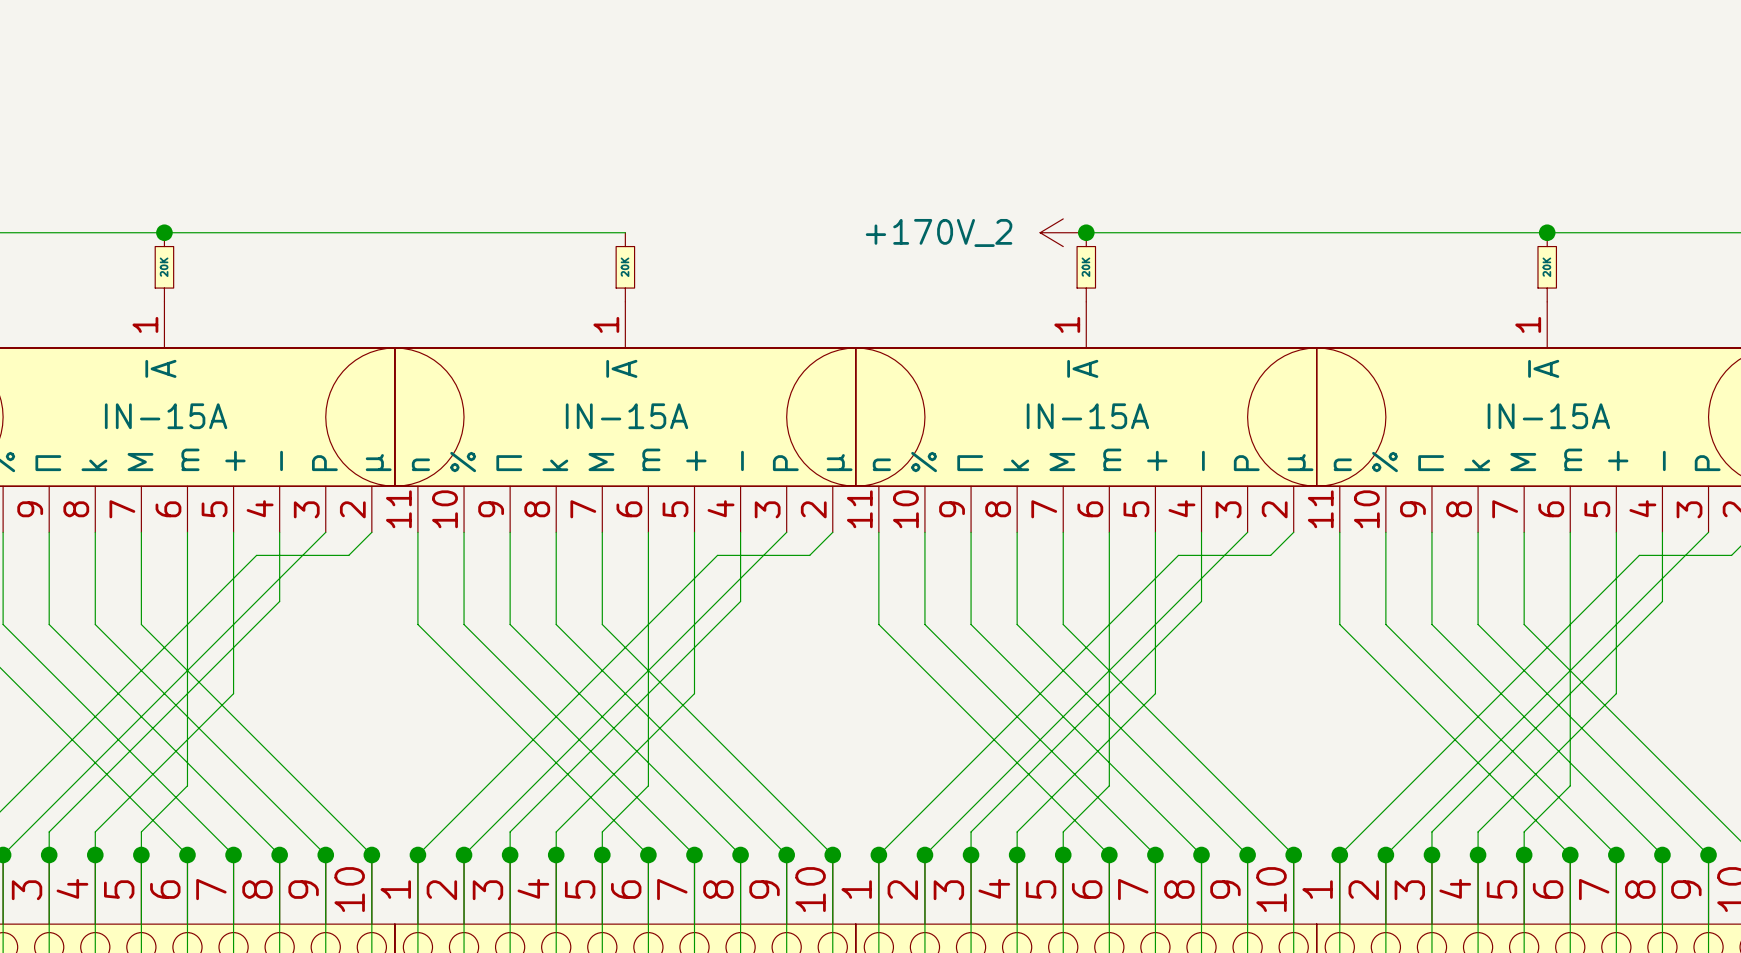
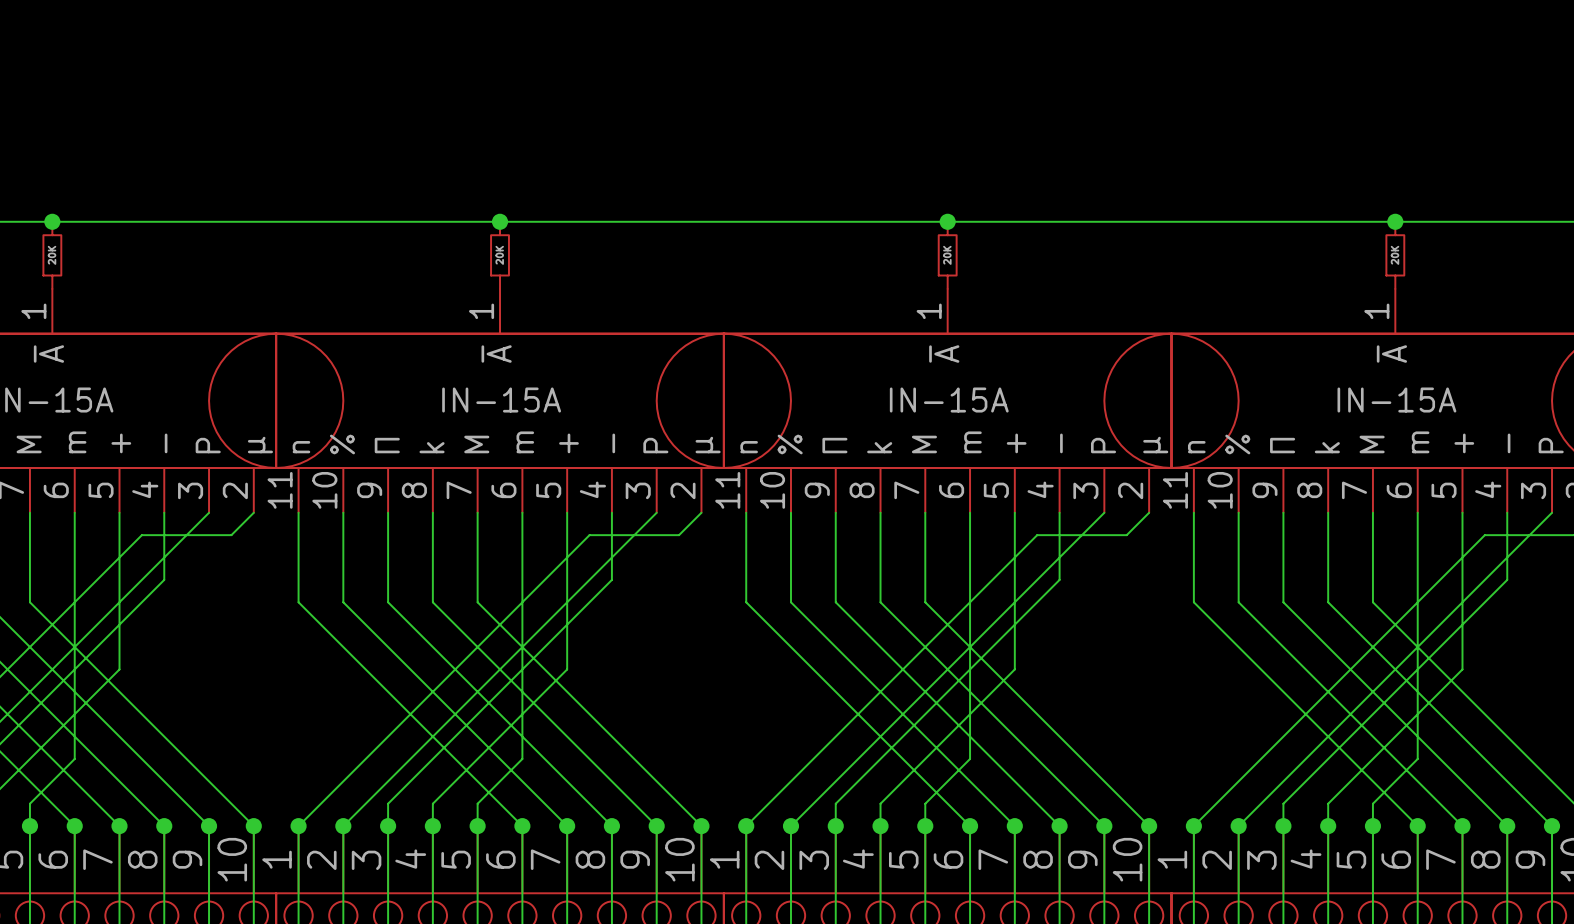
wire: none -> (500, 221) (947, 221)
junction: none -> (500, 221)
power symbol: +170V_2 (1063, 232) -> none

